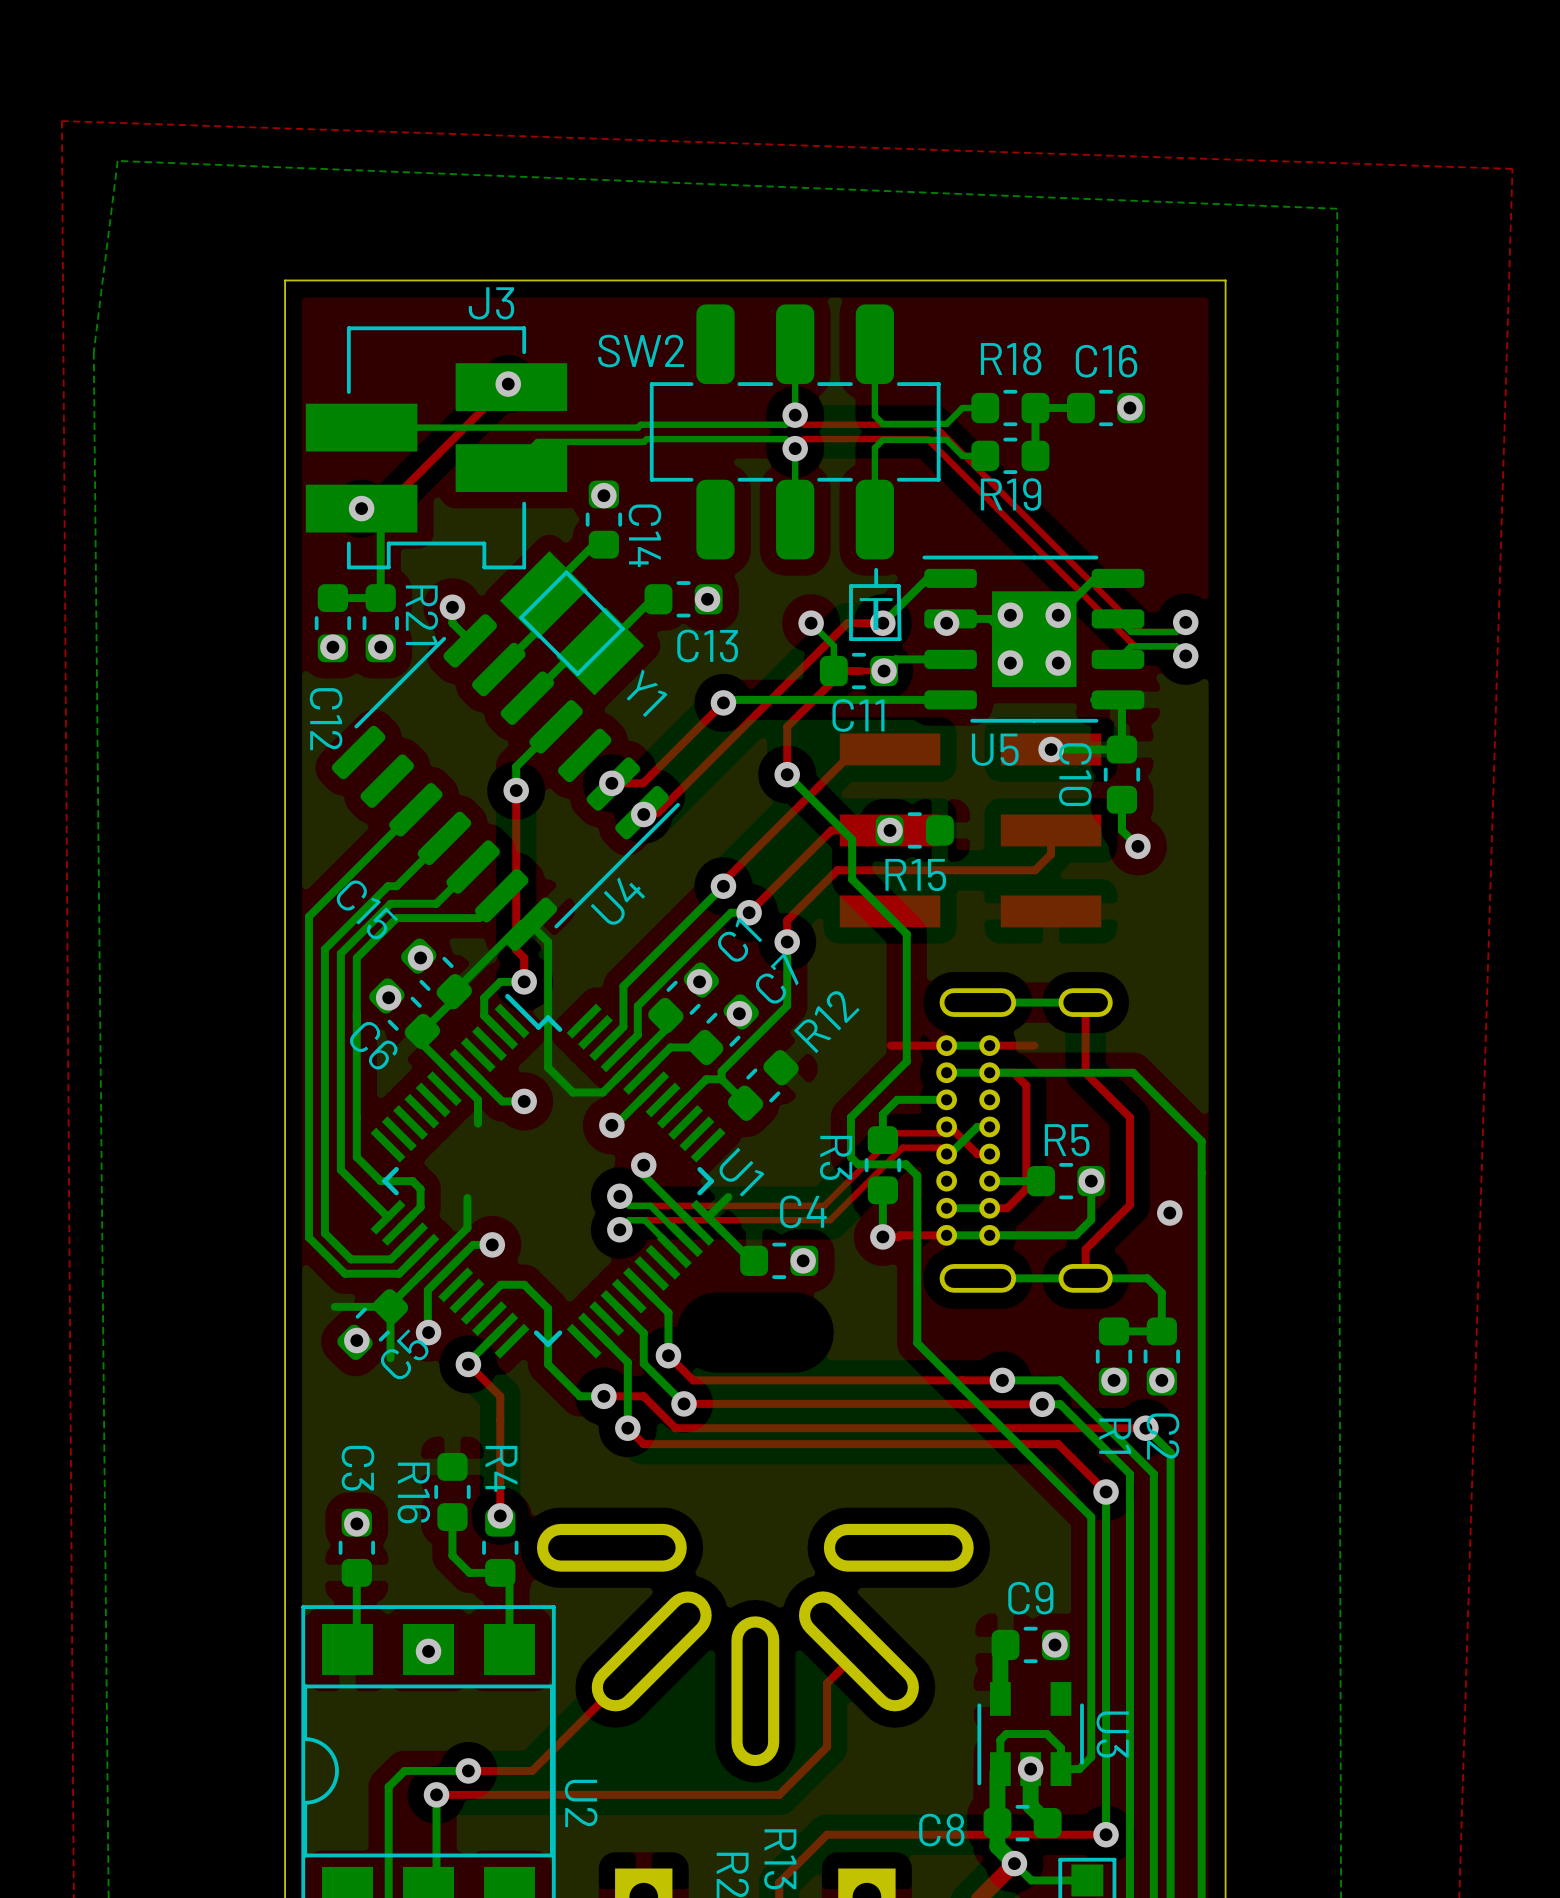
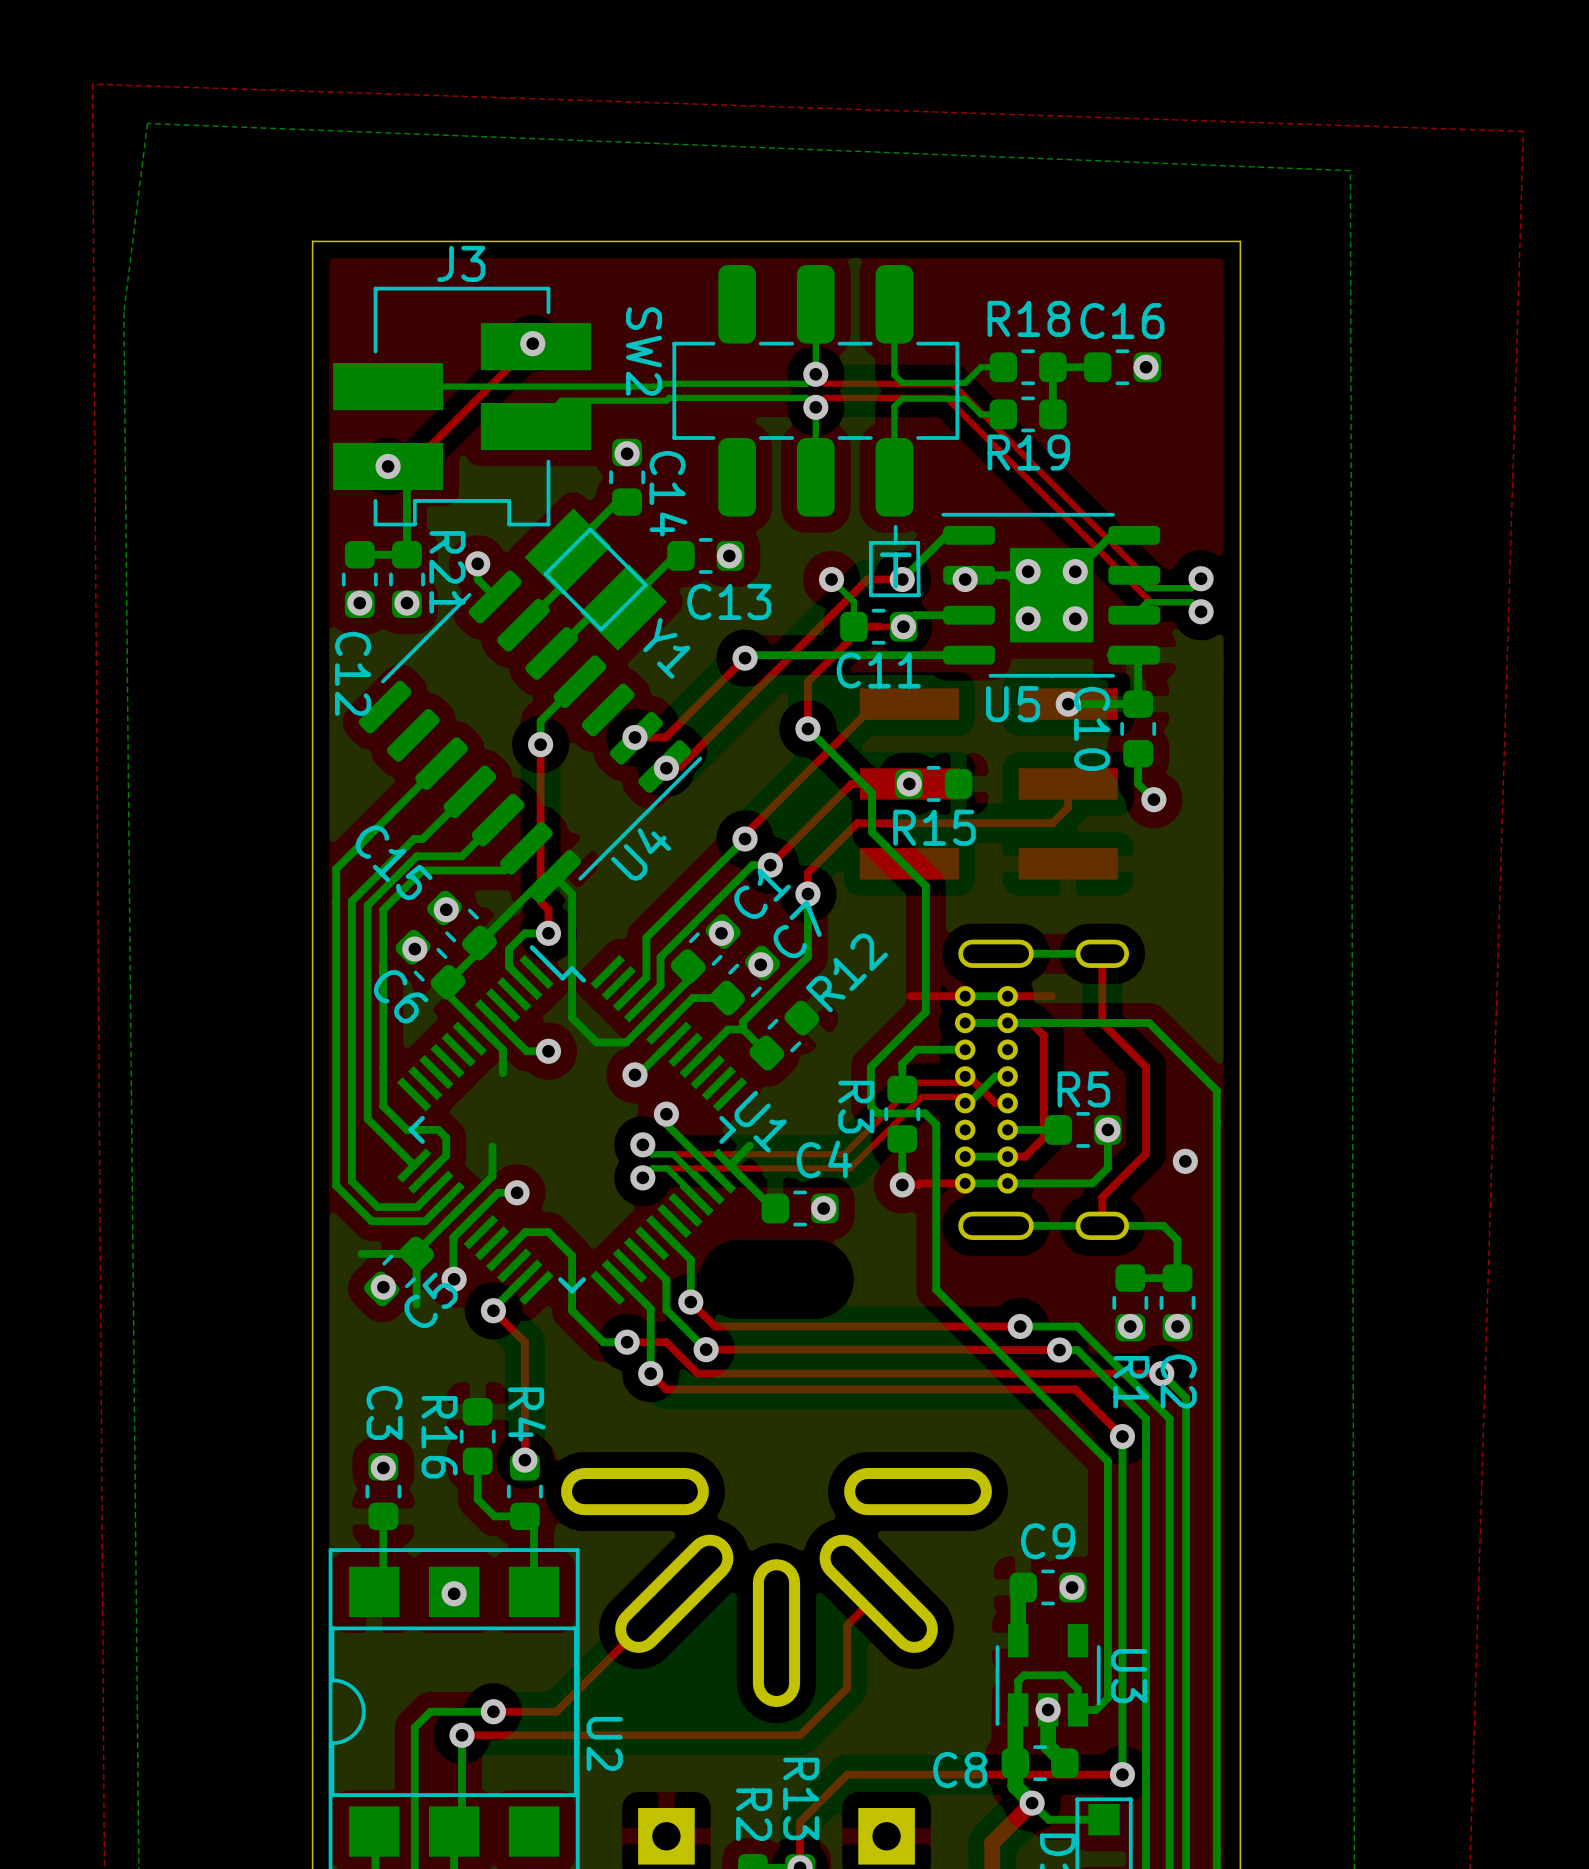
J3 name position: J3 (491, 303) -> J3 (461, 263)
SW2 name rotation: 0° (641, 351) -> 90° clockwise (644, 351)

